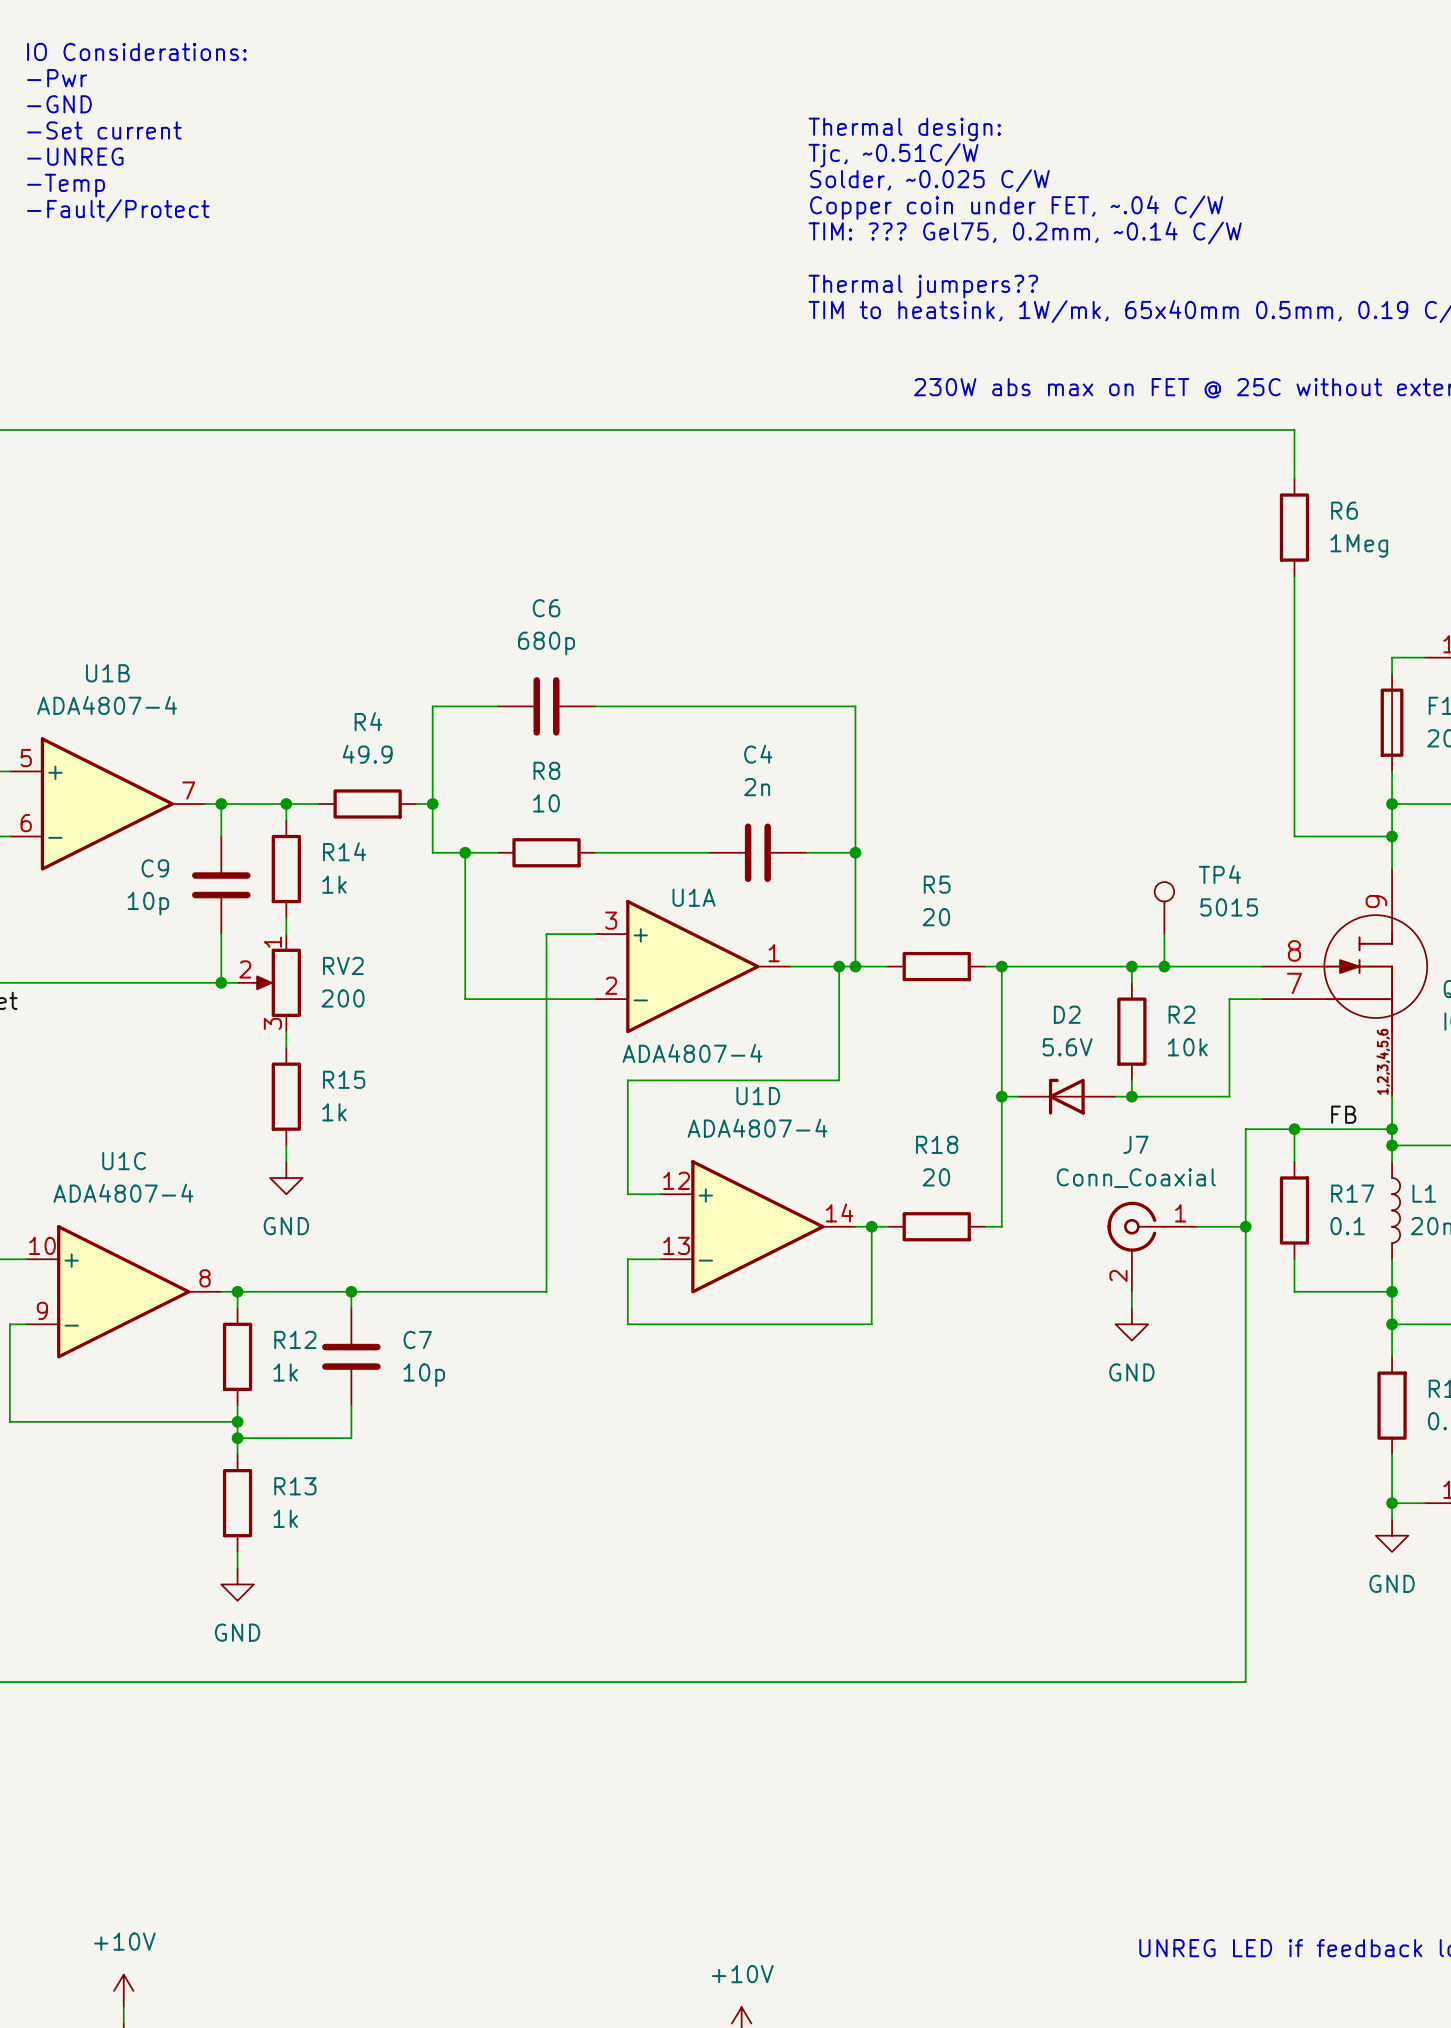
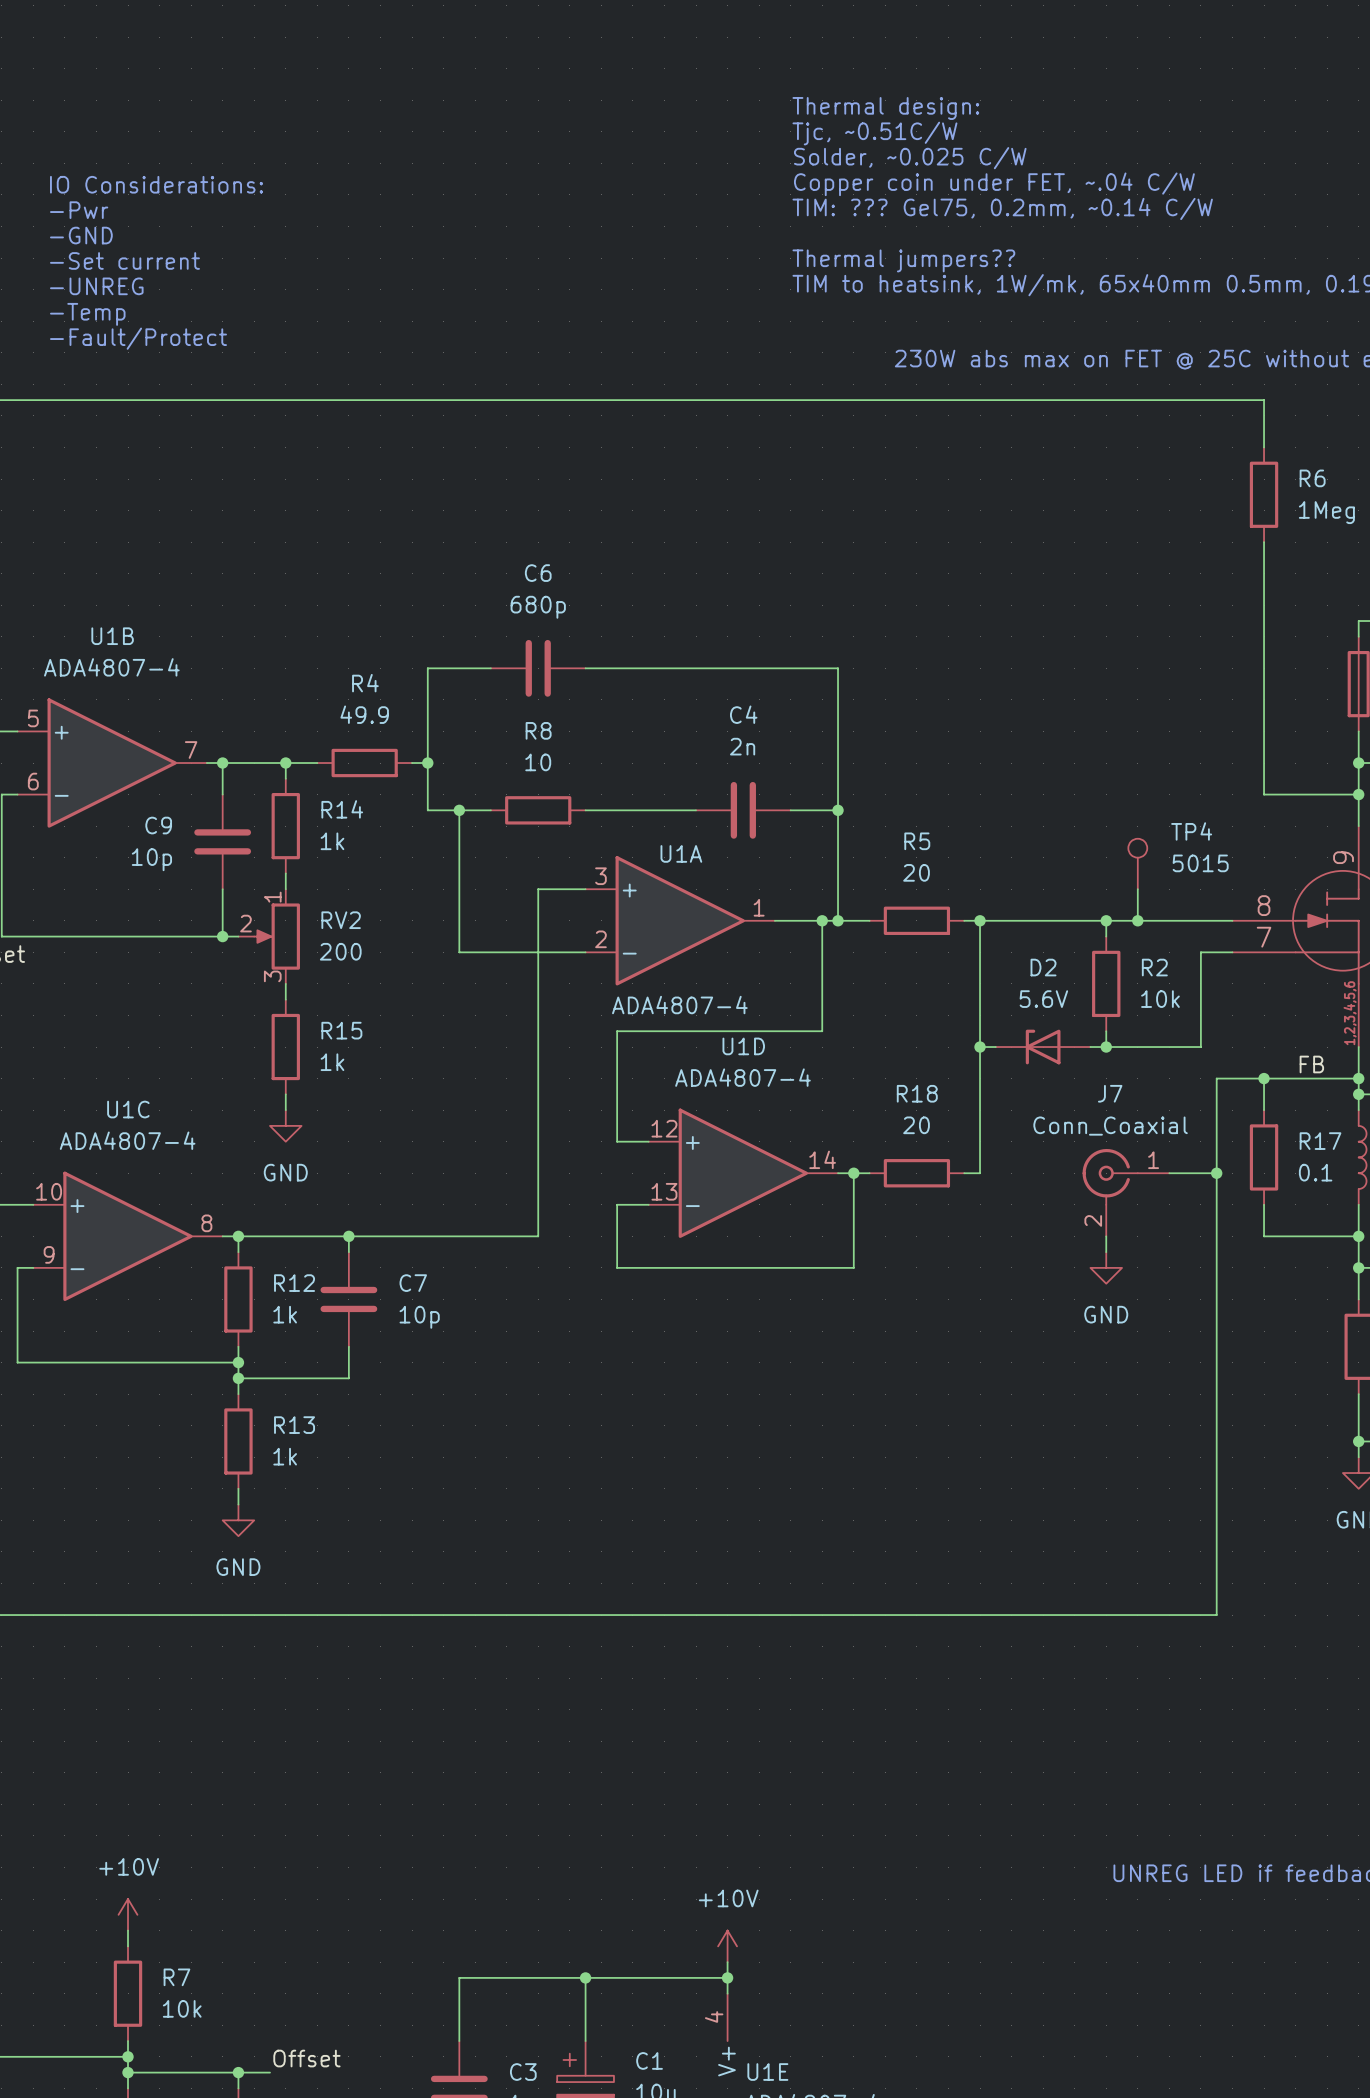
text position: IO Considerations: (136, 51) -> IO Considerations: (156, 184)
text position: -Pwr (57, 78) -> -Pwr (79, 210)
text position: -GND (59, 104) -> -GND (81, 235)
text position: -Set current (104, 130) -> -Set current (124, 260)
text position: -UNREG (75, 156) -> -UNREG (96, 286)
text position: -Temp (66, 185) -> -Temp (87, 314)
text position: -Fault/Protect (118, 210) -> -Fault/Protect (138, 338)

